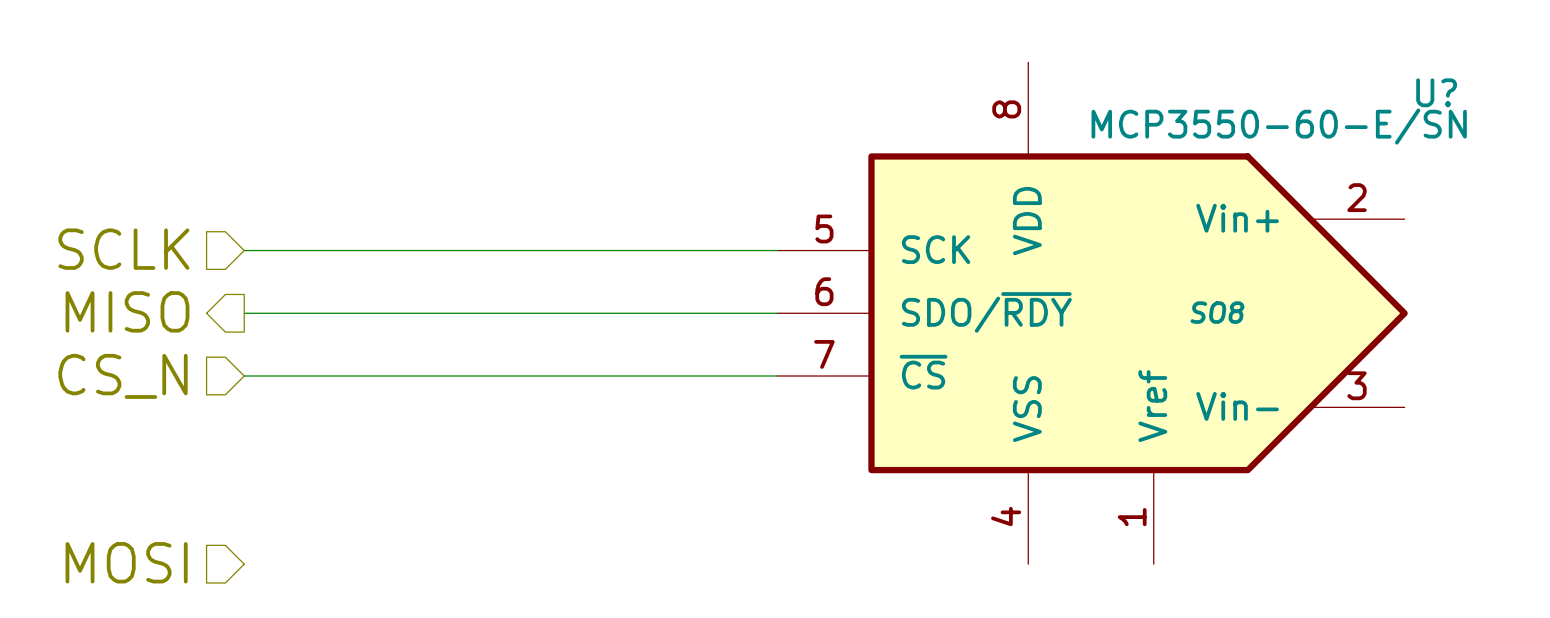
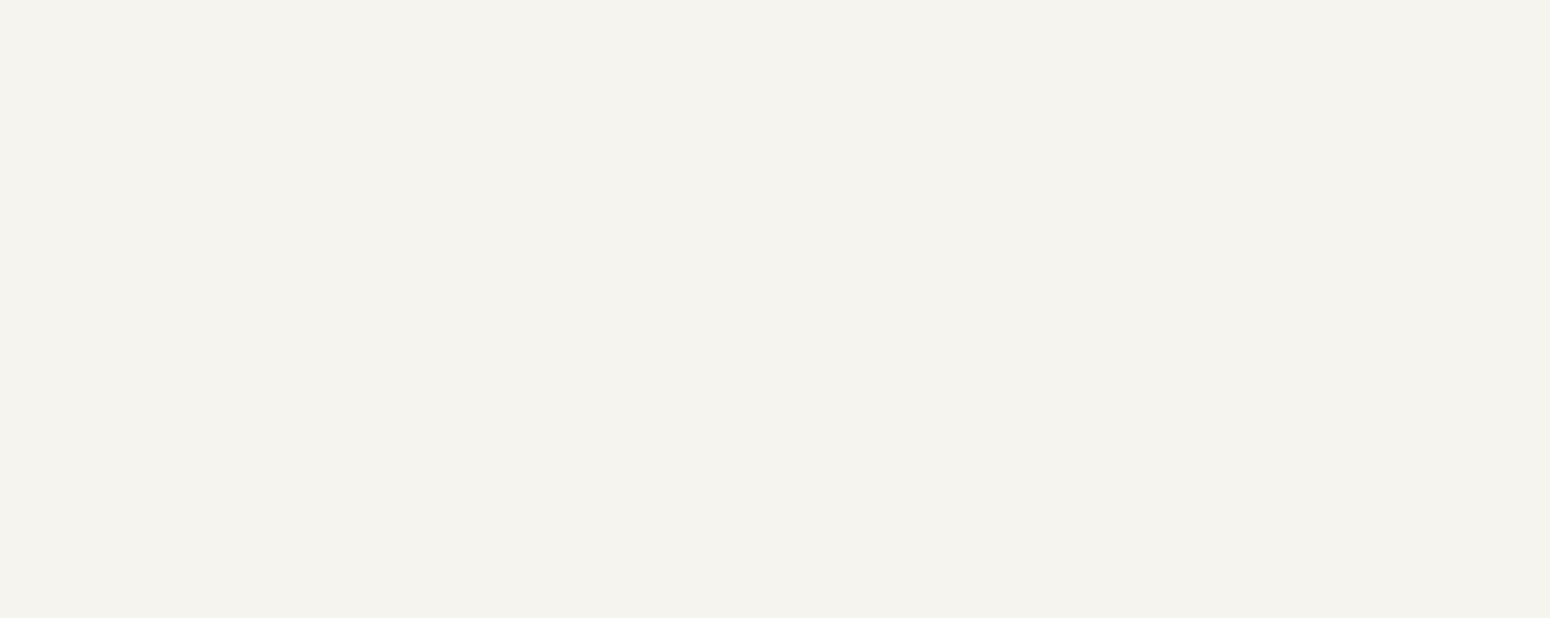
hierarchical label: SCLK (123, 249) -> none
wire: (244, 250) (777, 250) -> none
hierarchical label: MISO (127, 311) -> none
wire: (244, 313) (777, 313) -> none
U?: MCP3550-60-E/SN (1092, 313) -> none
hierarchical label: CS_N (123, 376) -> none
wire: (244, 376) (777, 376) -> none
hierarchical label: MOSI (126, 562) -> none

